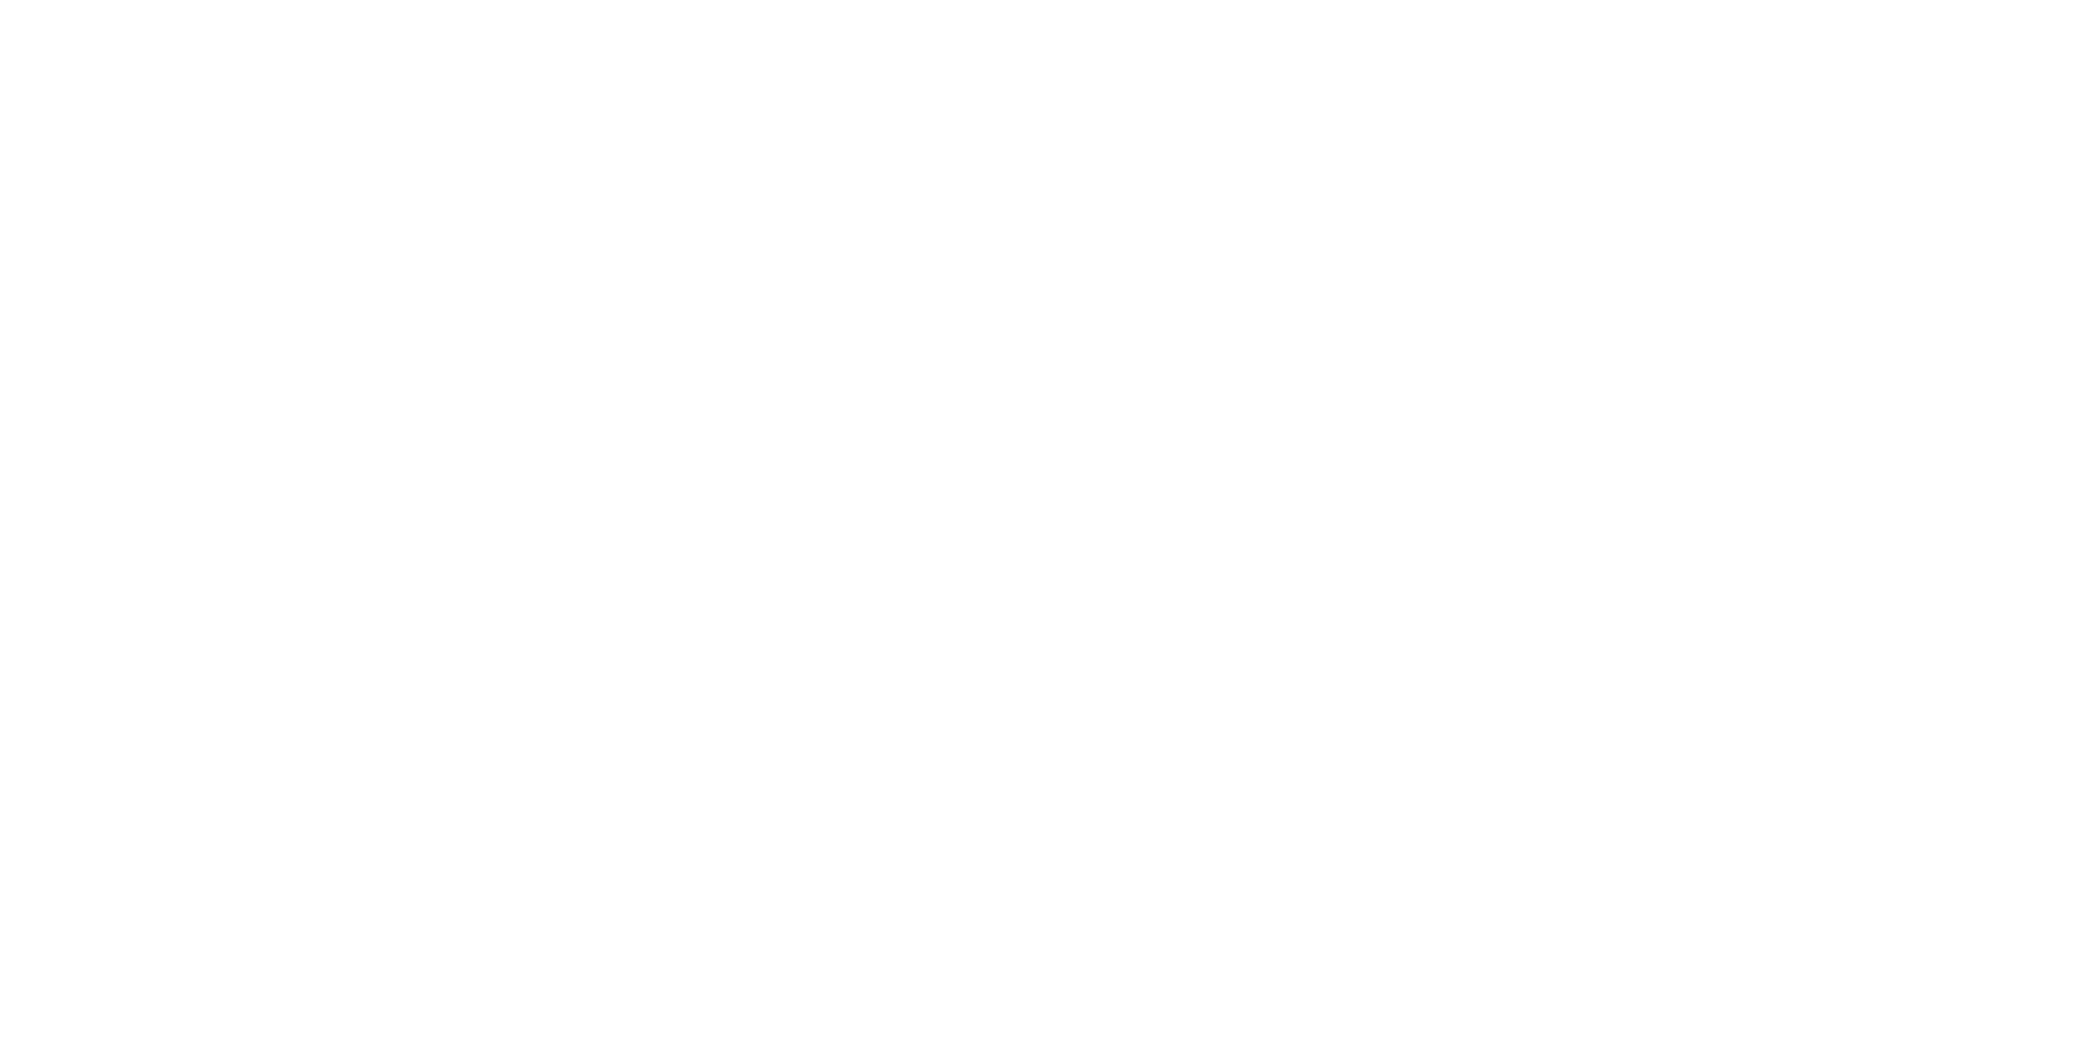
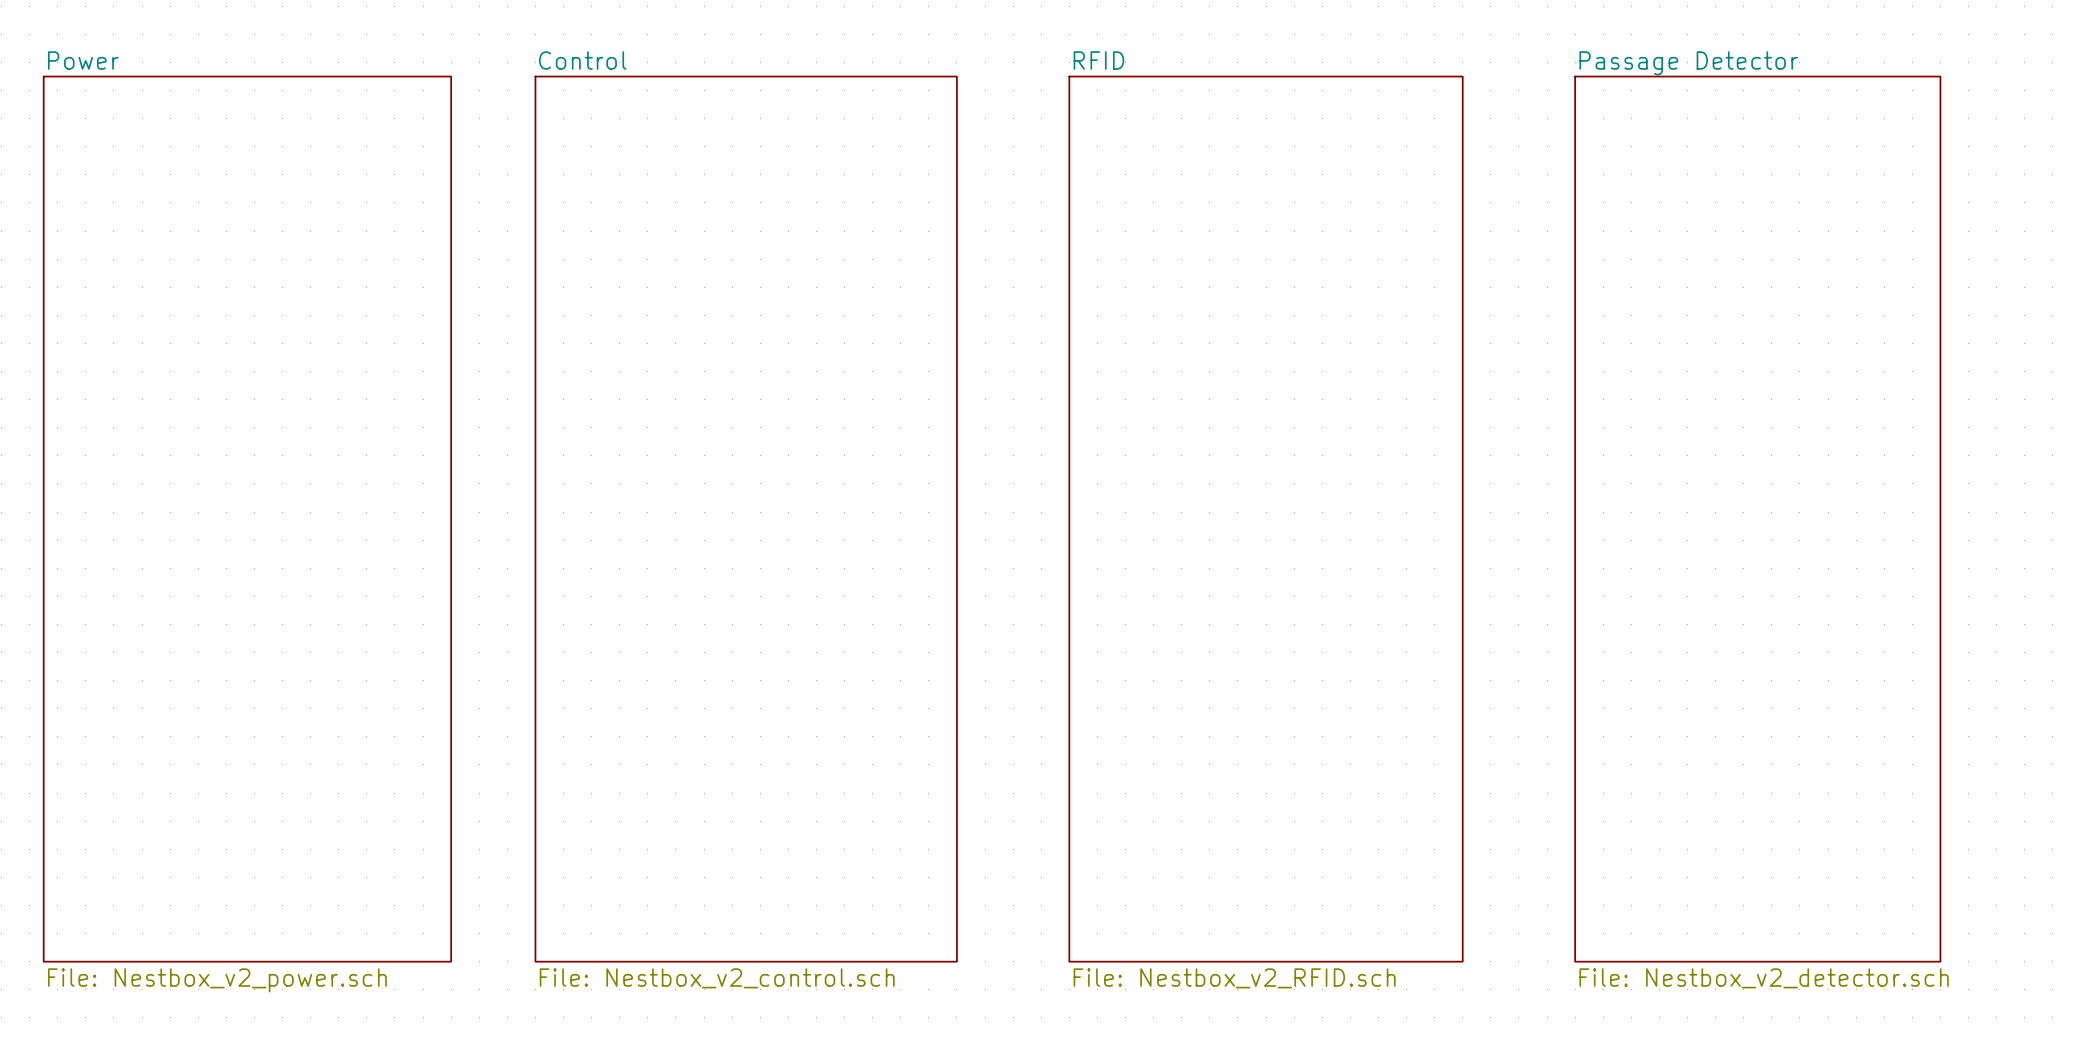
sheet Power: none -> File: Nestbox_v2_power.sch (247, 519)
sheet Control: none -> File: Nestbox_v2_control.sch (746, 519)
sheet RFID: none -> File: Nestbox_v2_RFID.sch (1266, 519)
sheet Passage Detector: none -> File: Nestbox_v2_detector.sch (1757, 519)

